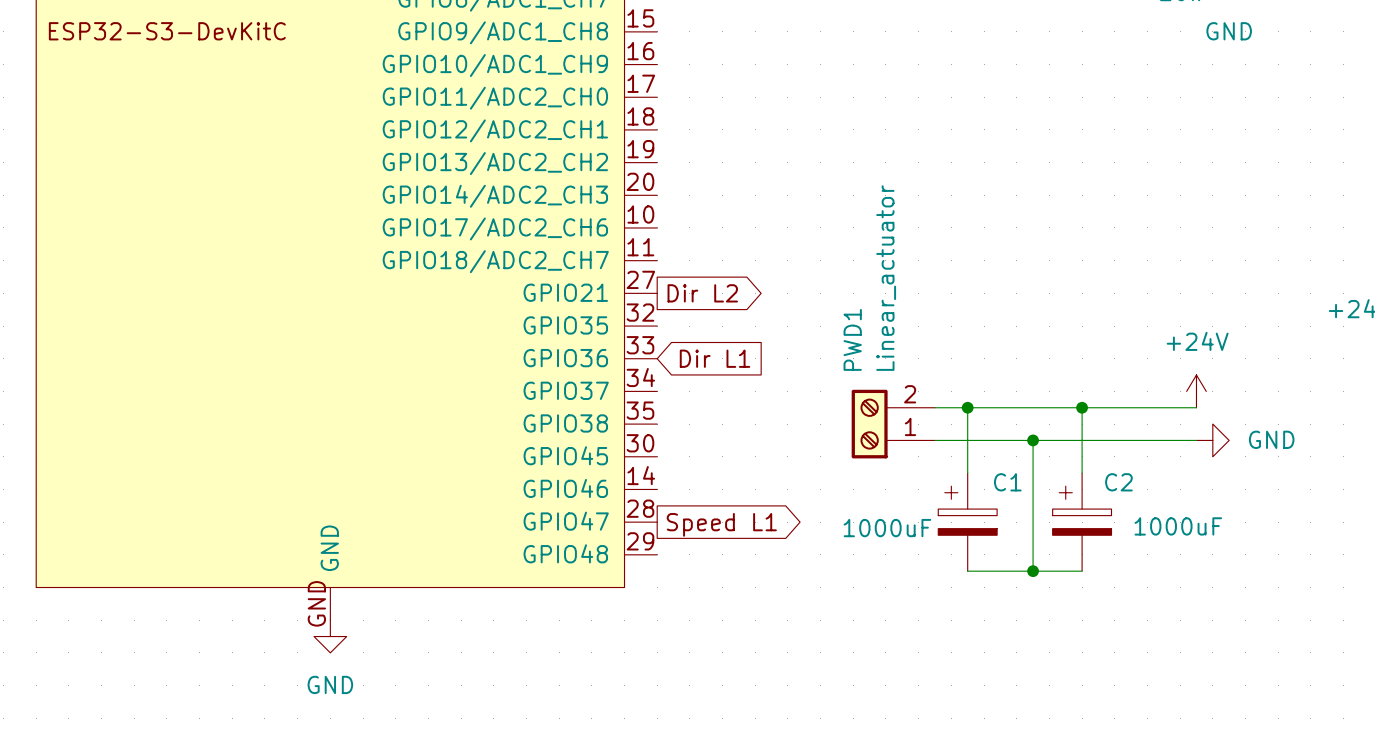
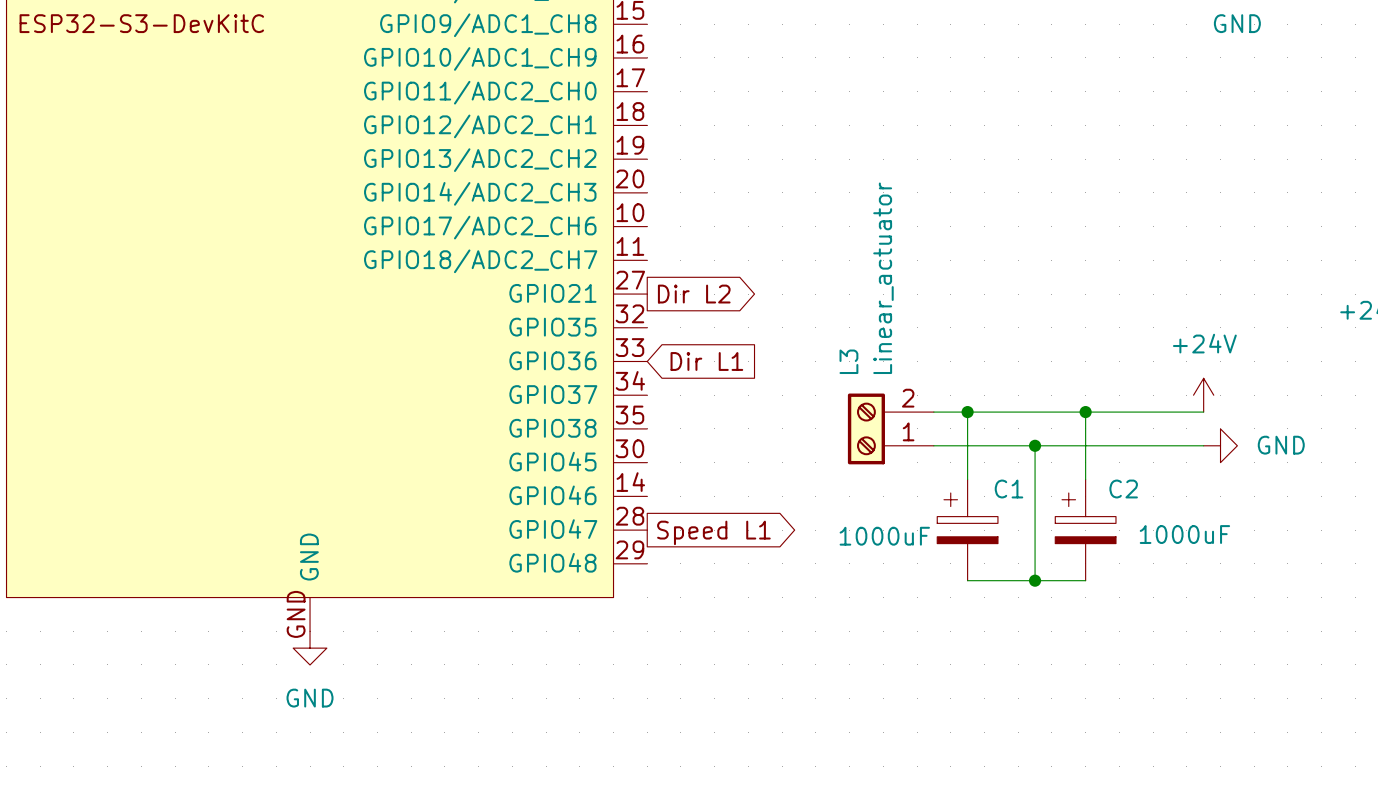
PWD1 name: PWD1 (852, 339) -> L3 (848, 361)

